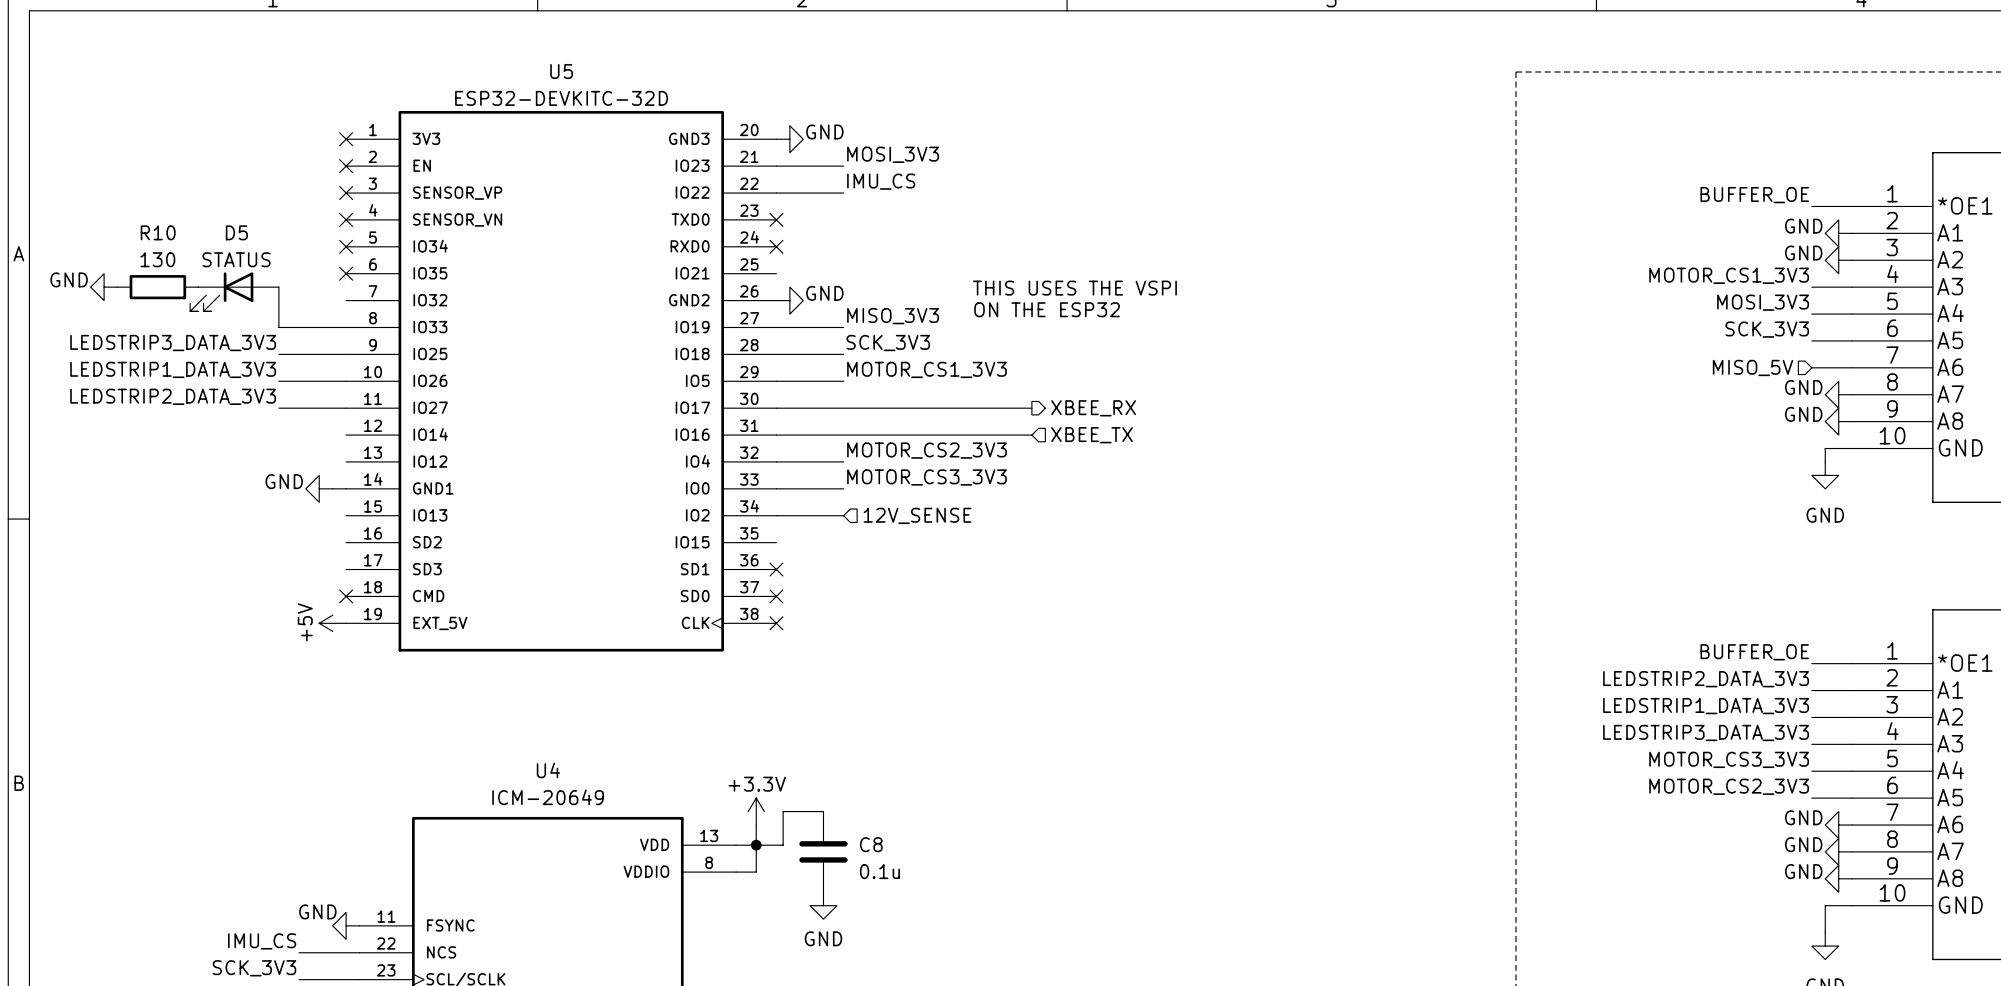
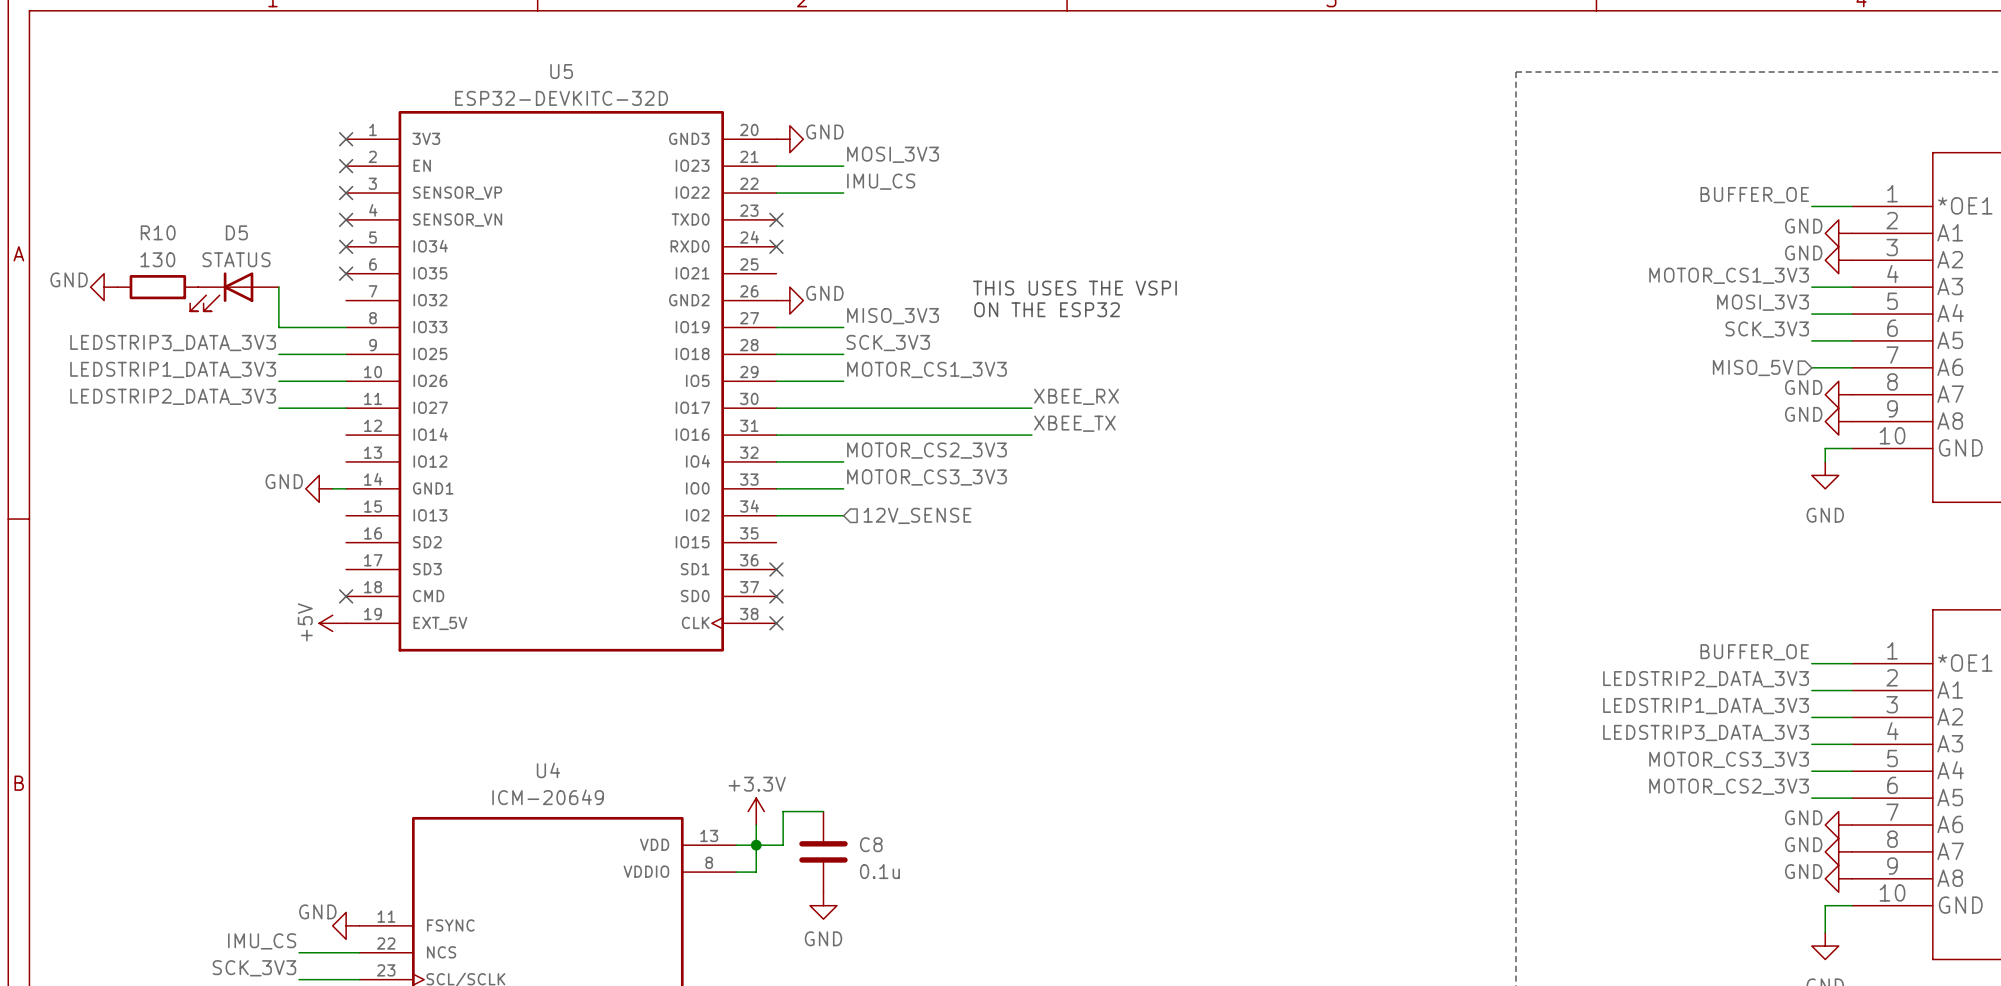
label: none -> XBEE_RX (1076, 396)
hierarchical label: XBEE_RX (1093, 408) -> none
label: none -> XBEE_TX (1074, 423)
hierarchical label: XBEE_TX (1091, 435) -> none

